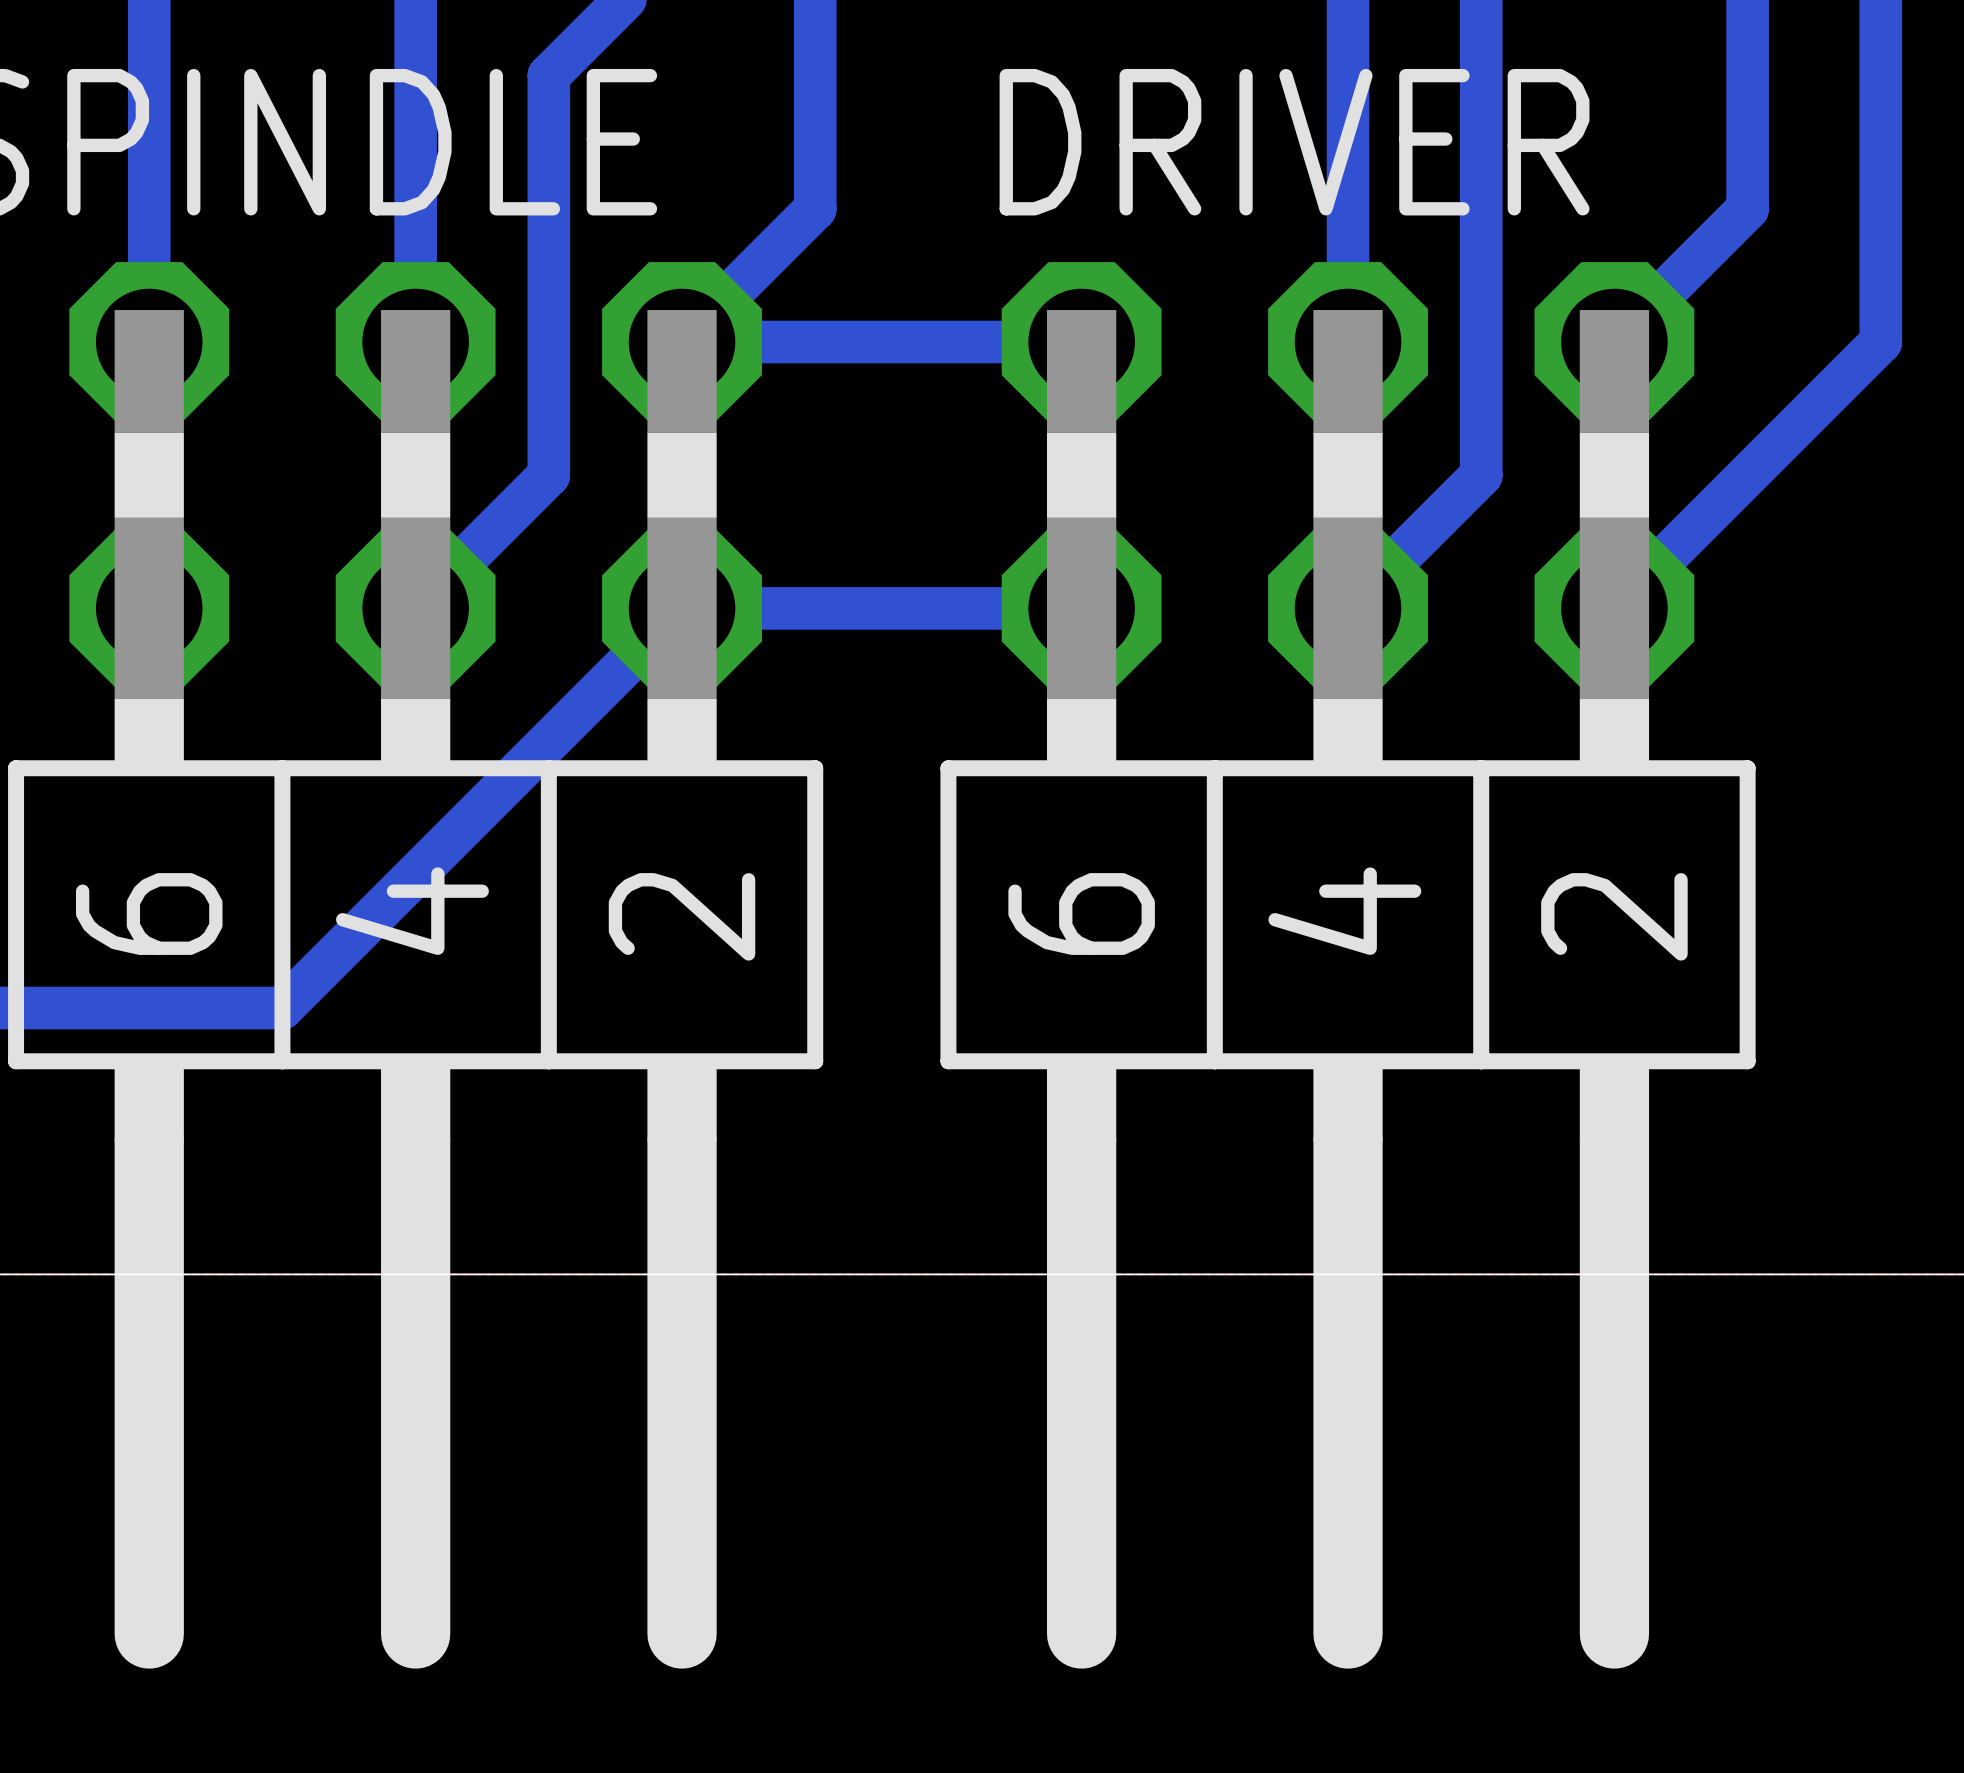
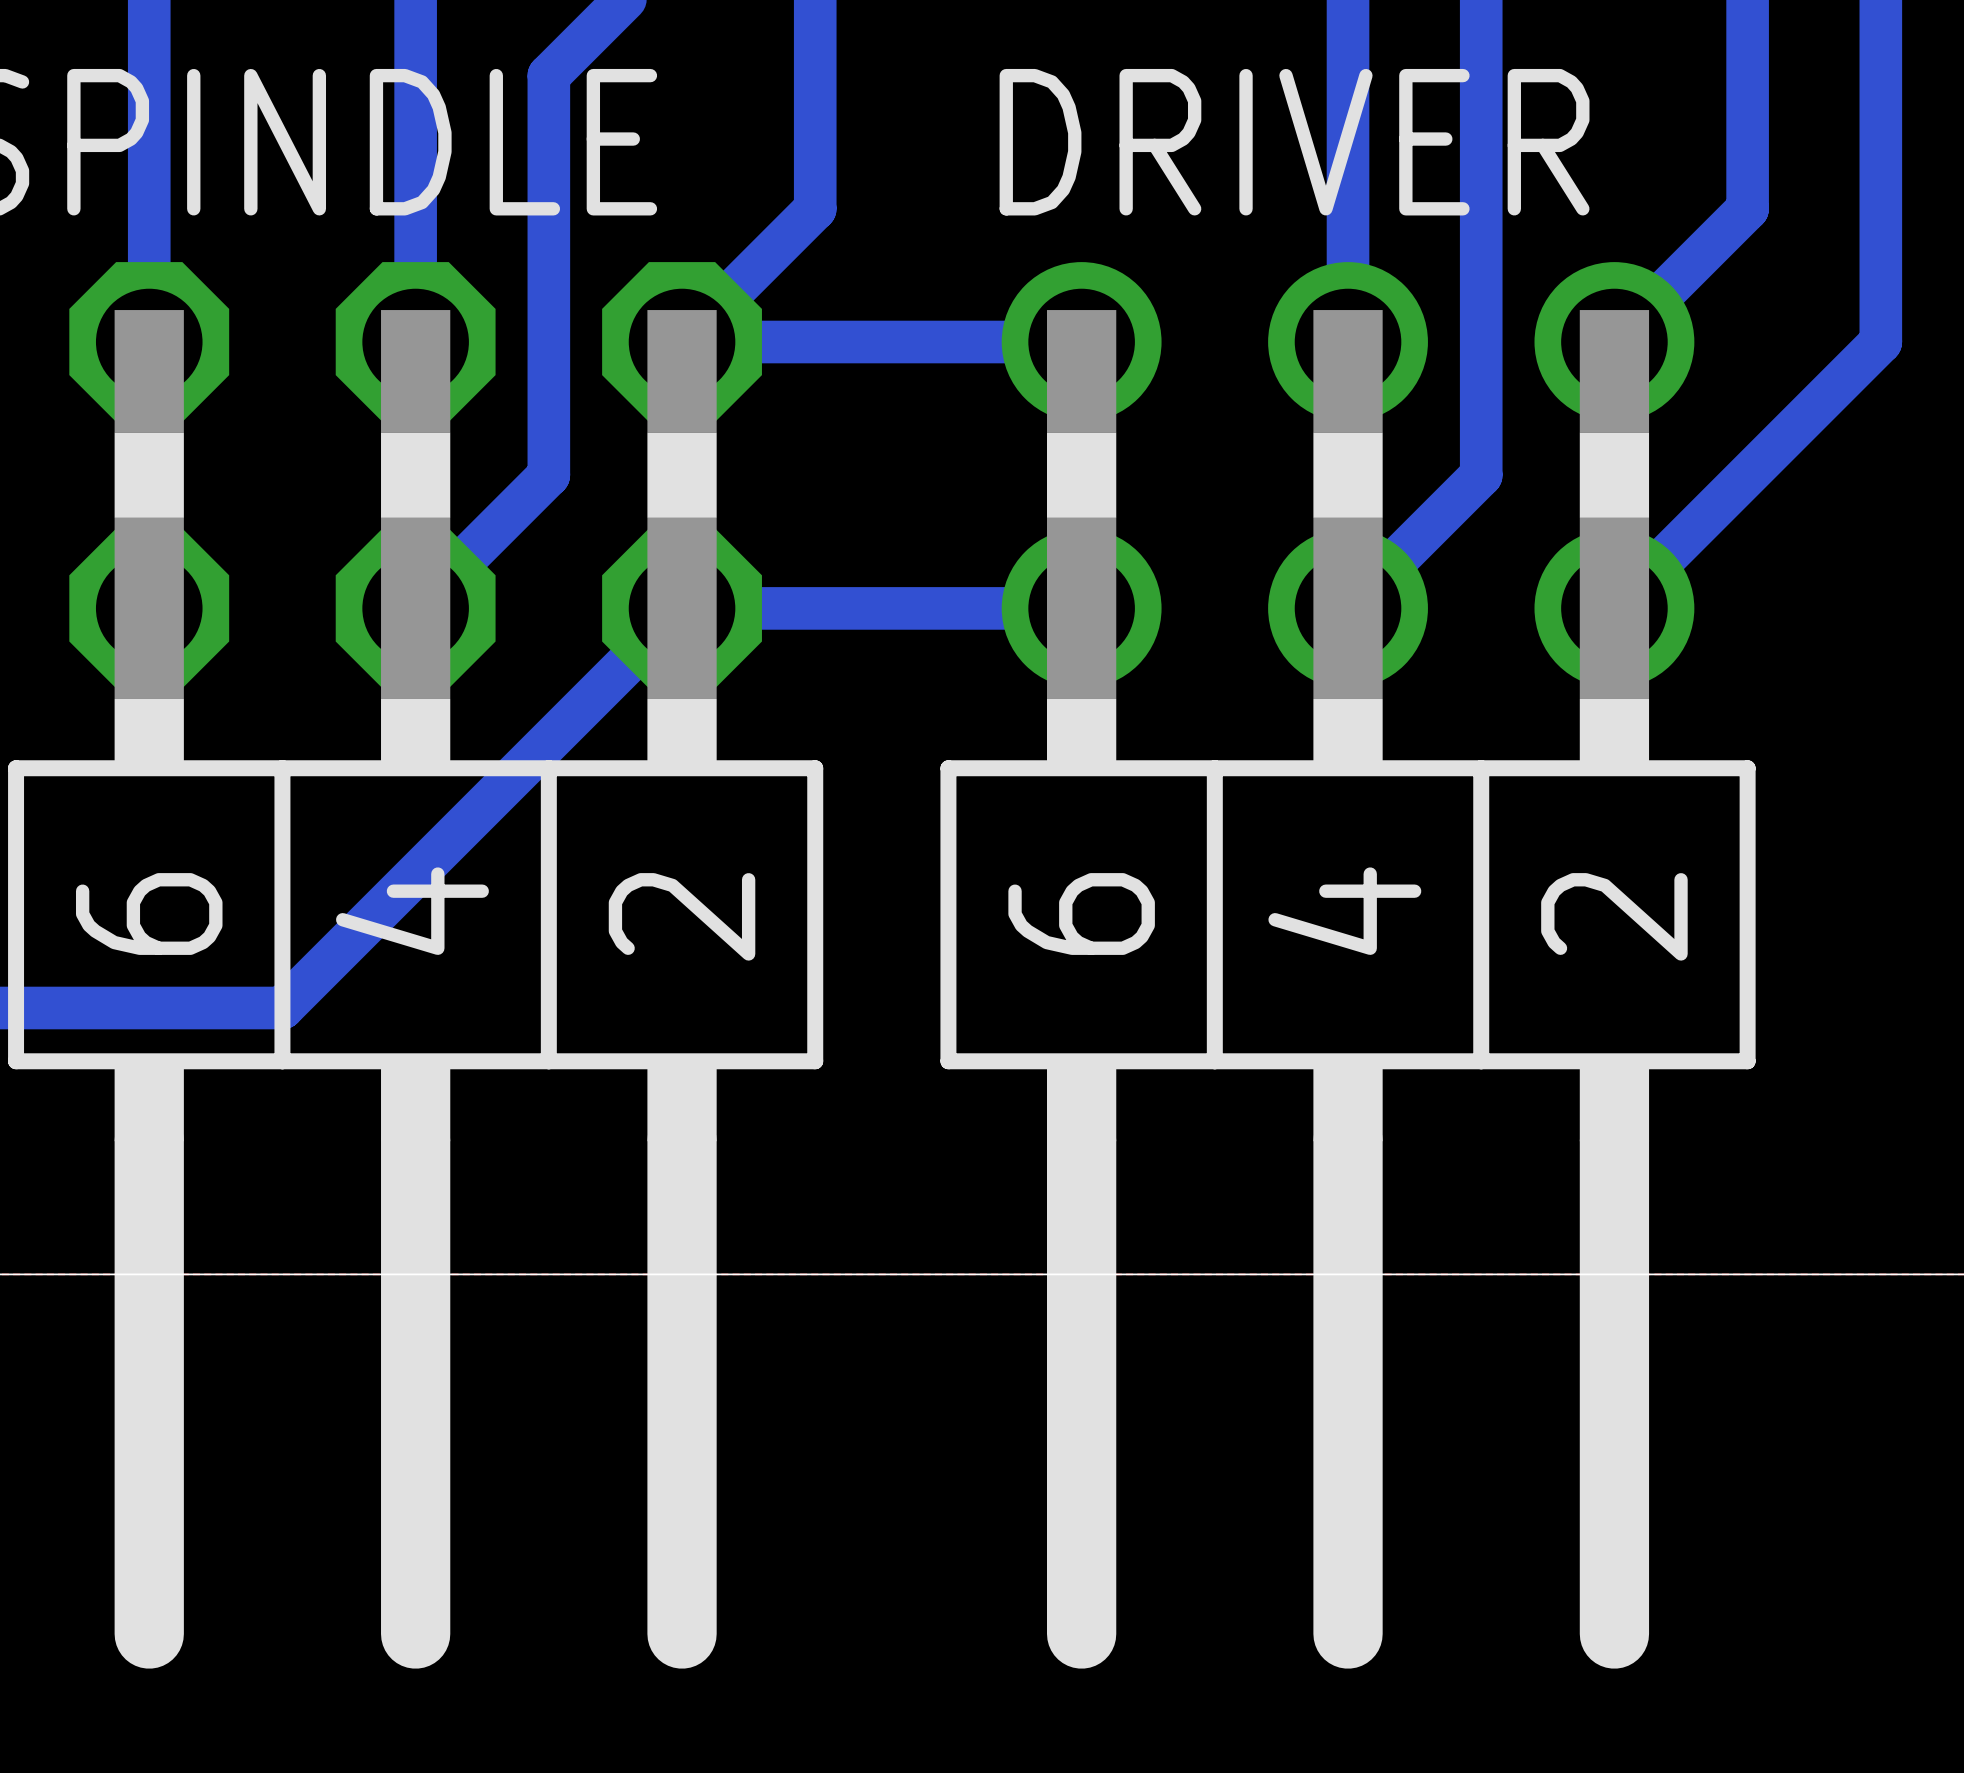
DRIVER footprint: [940, 262, 1756, 1669] -> [940, 262, 1756, 1669]

